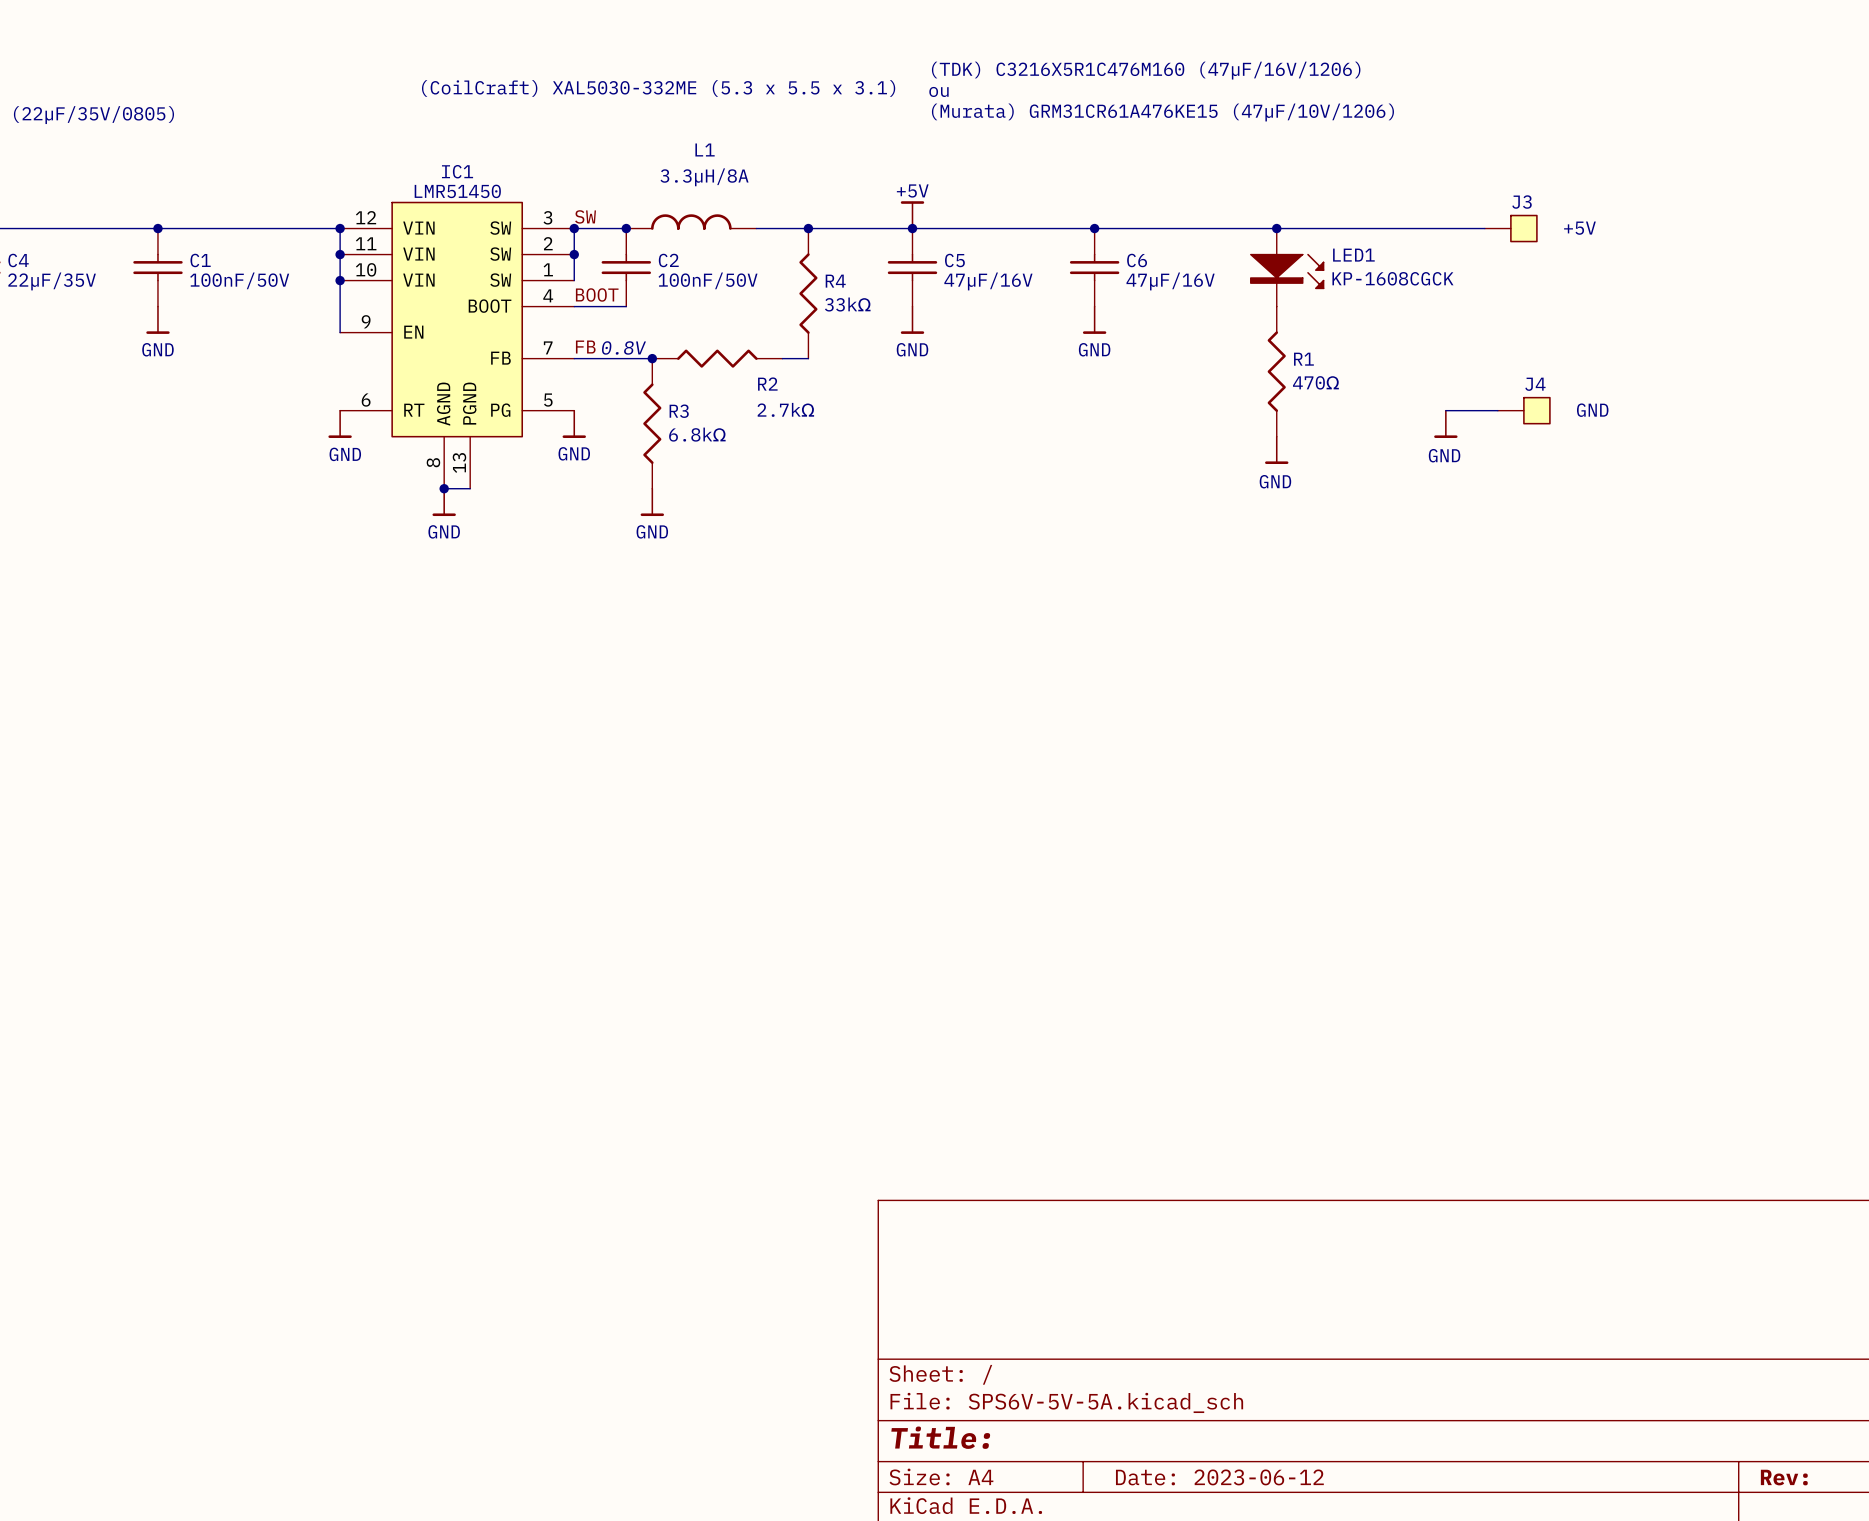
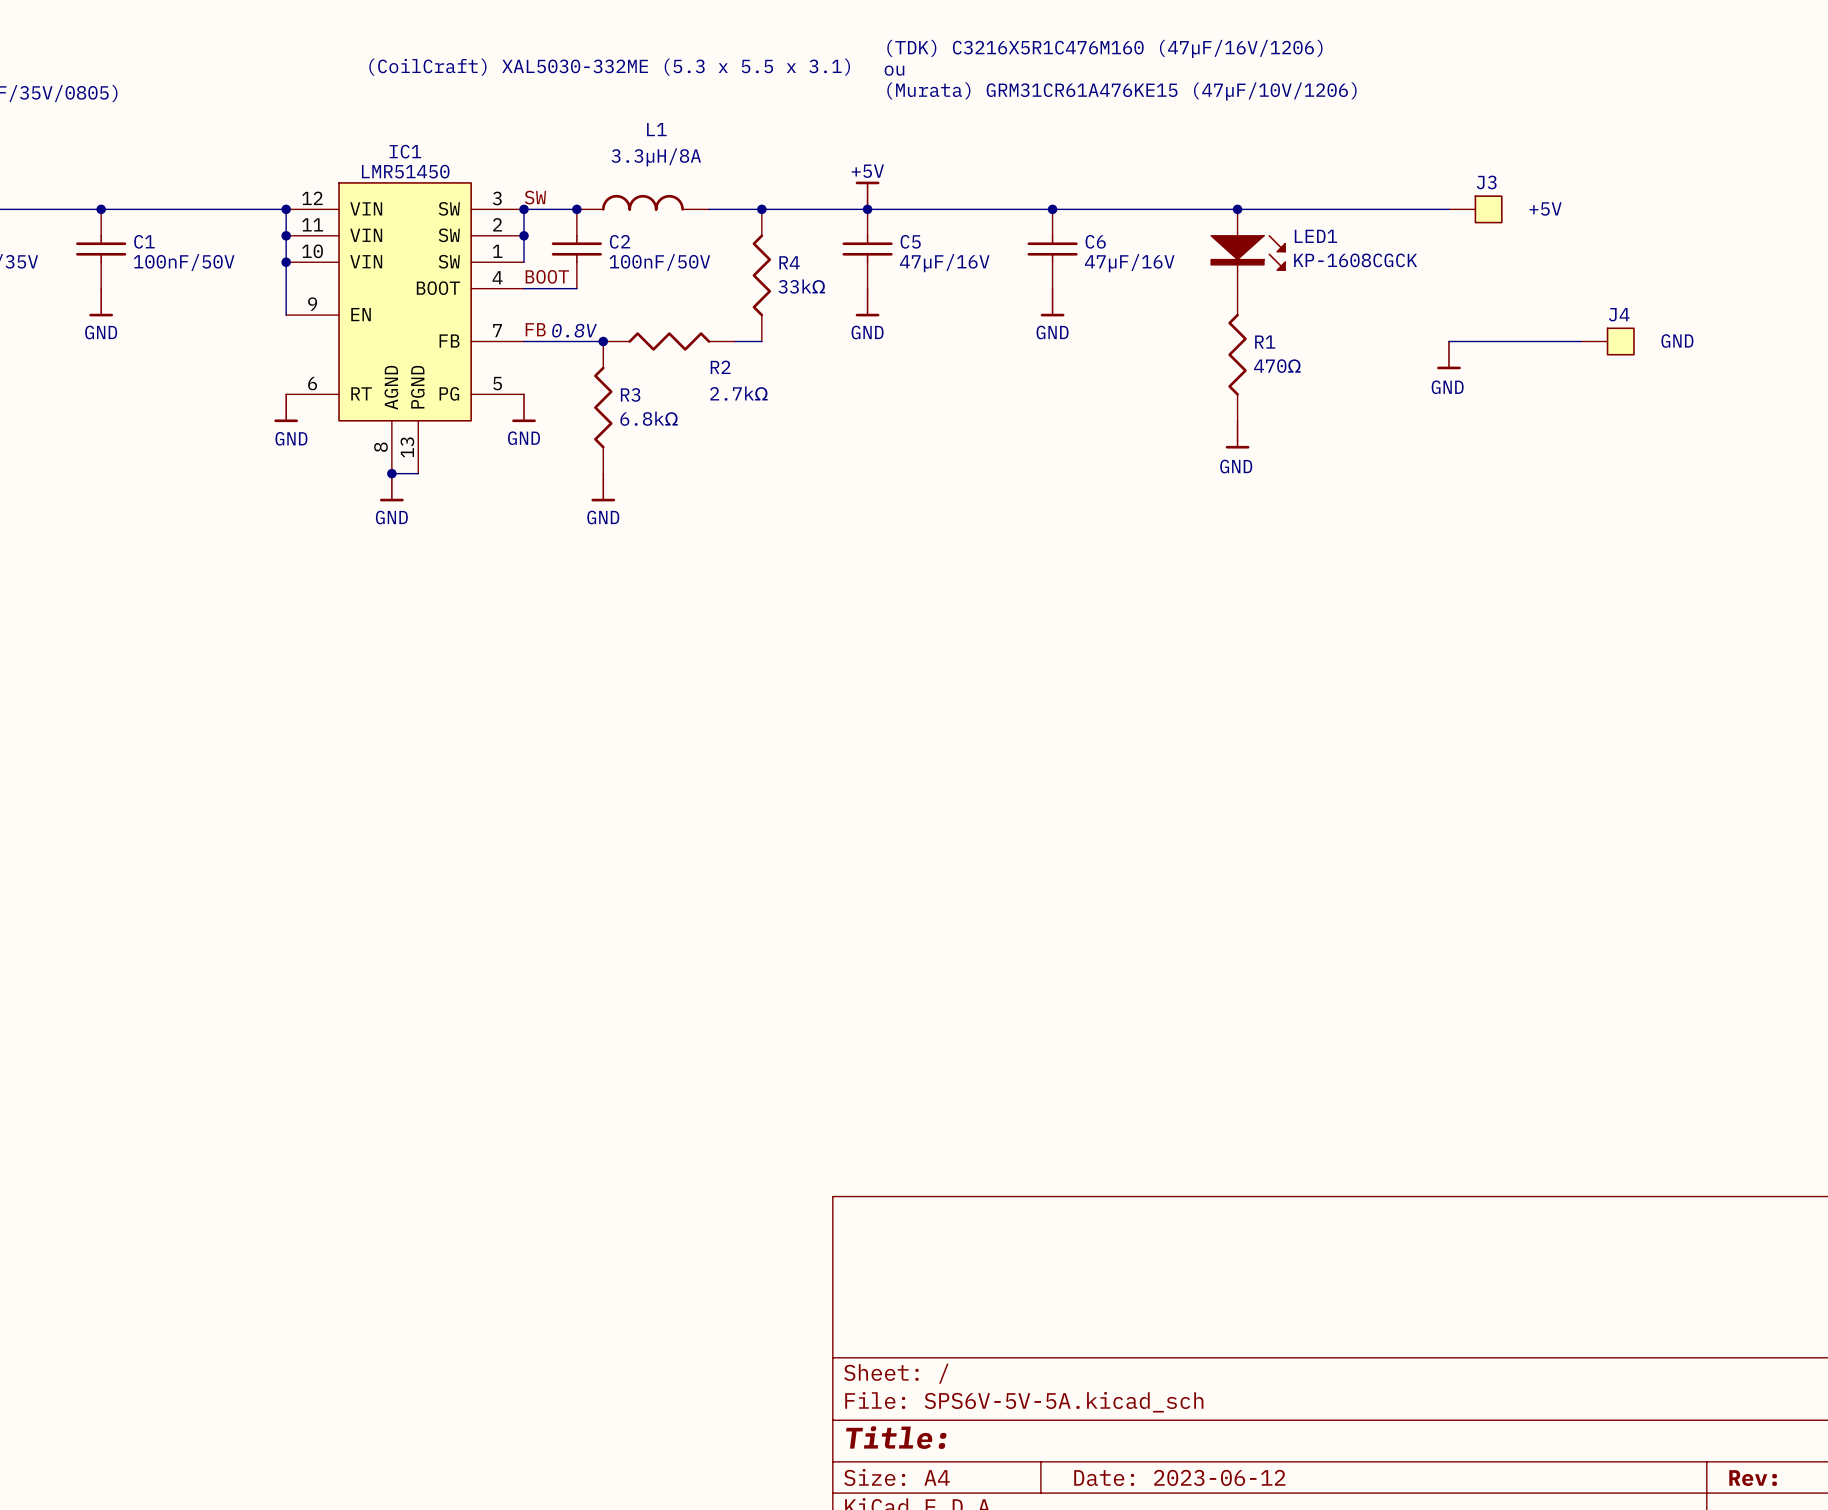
wire: none -> (1448, 341) (1581, 341)
wire: (1445, 410) (1497, 410) -> none
J4 position: (1524, 410) -> (1607, 341)
power symbol position: GND (1445, 423) -> GND (1448, 354)

